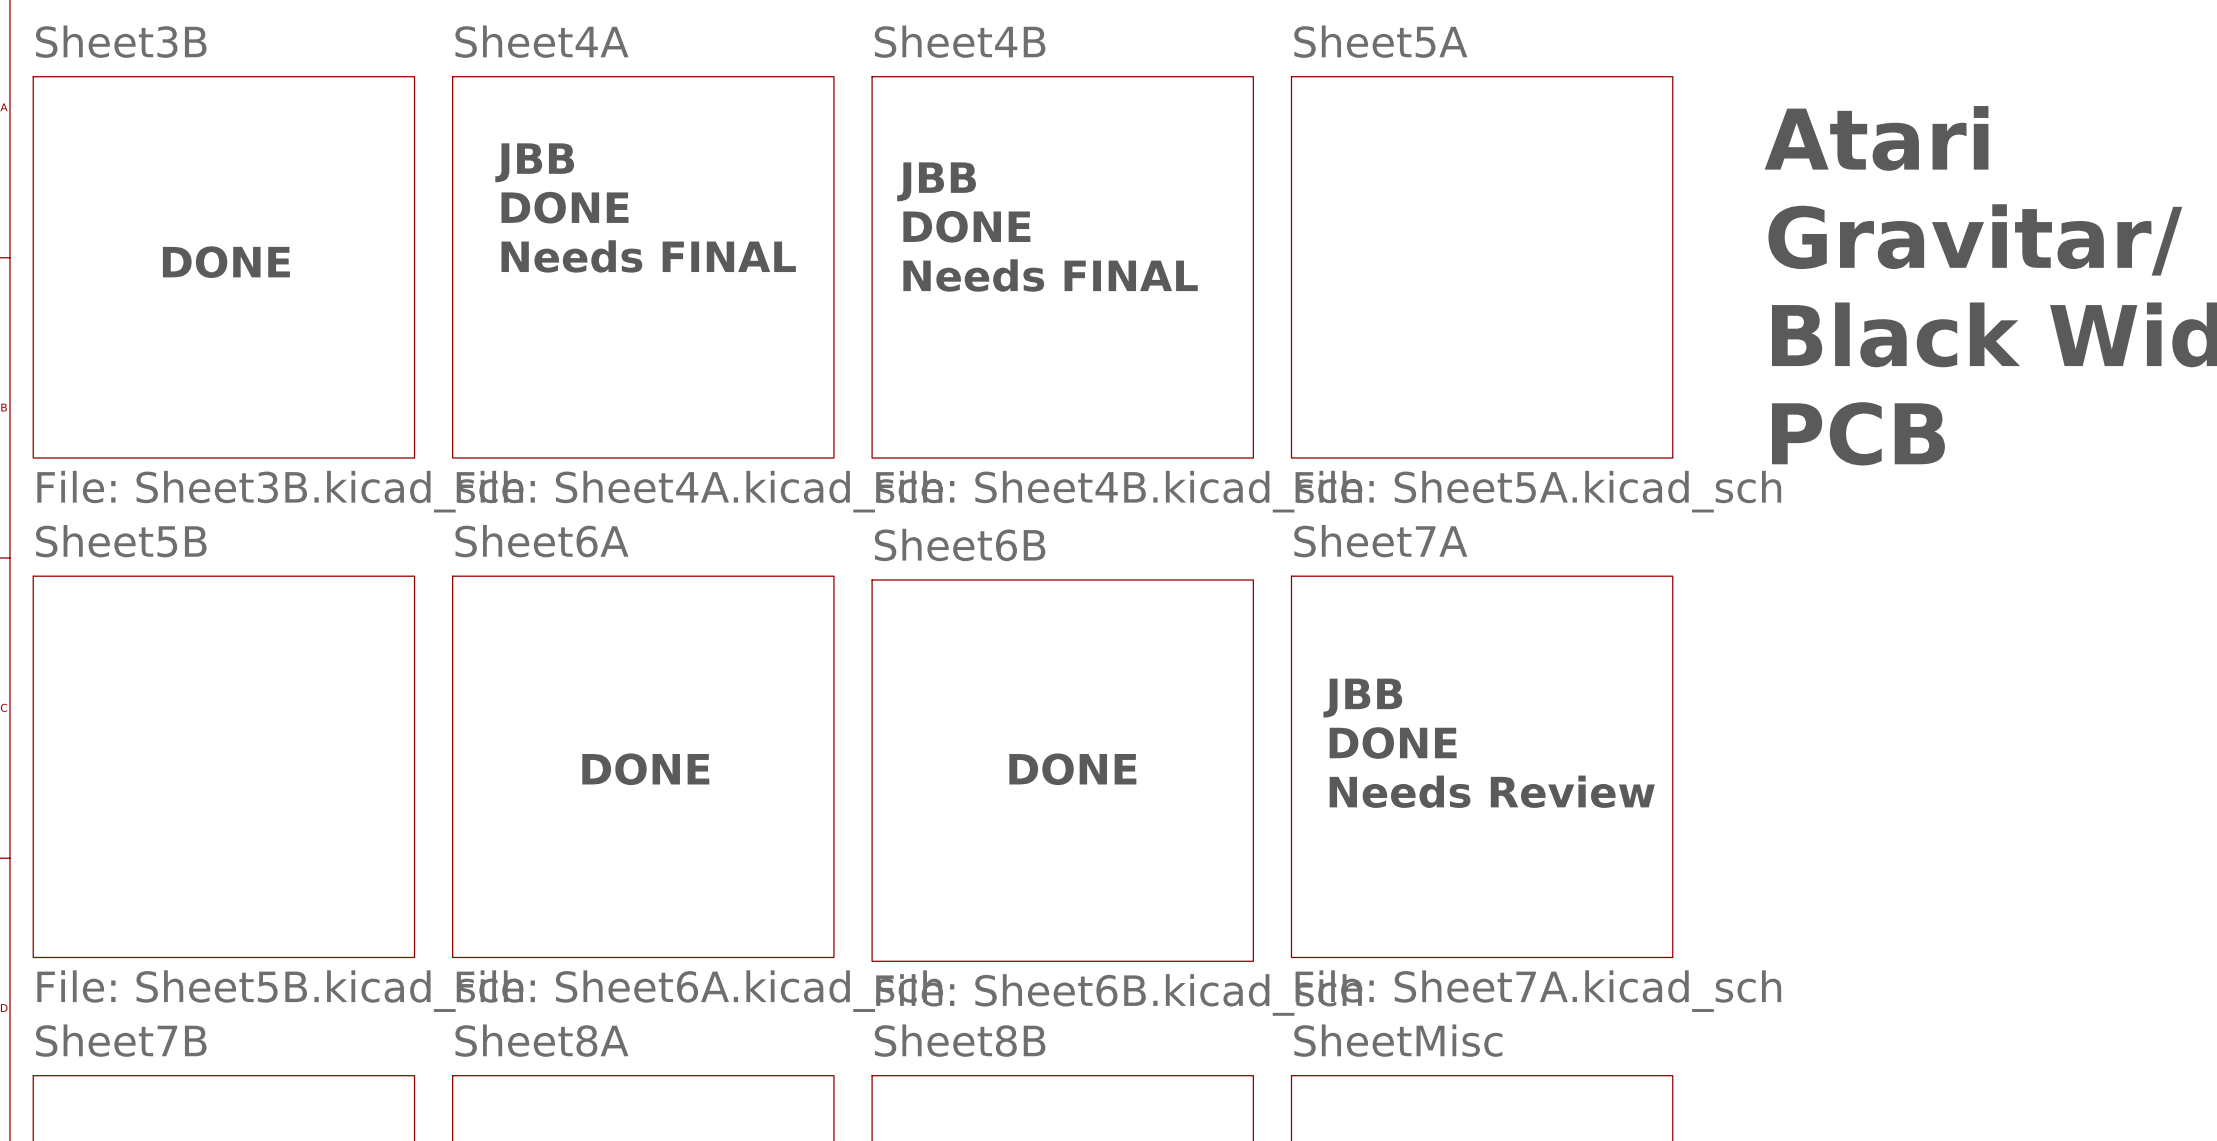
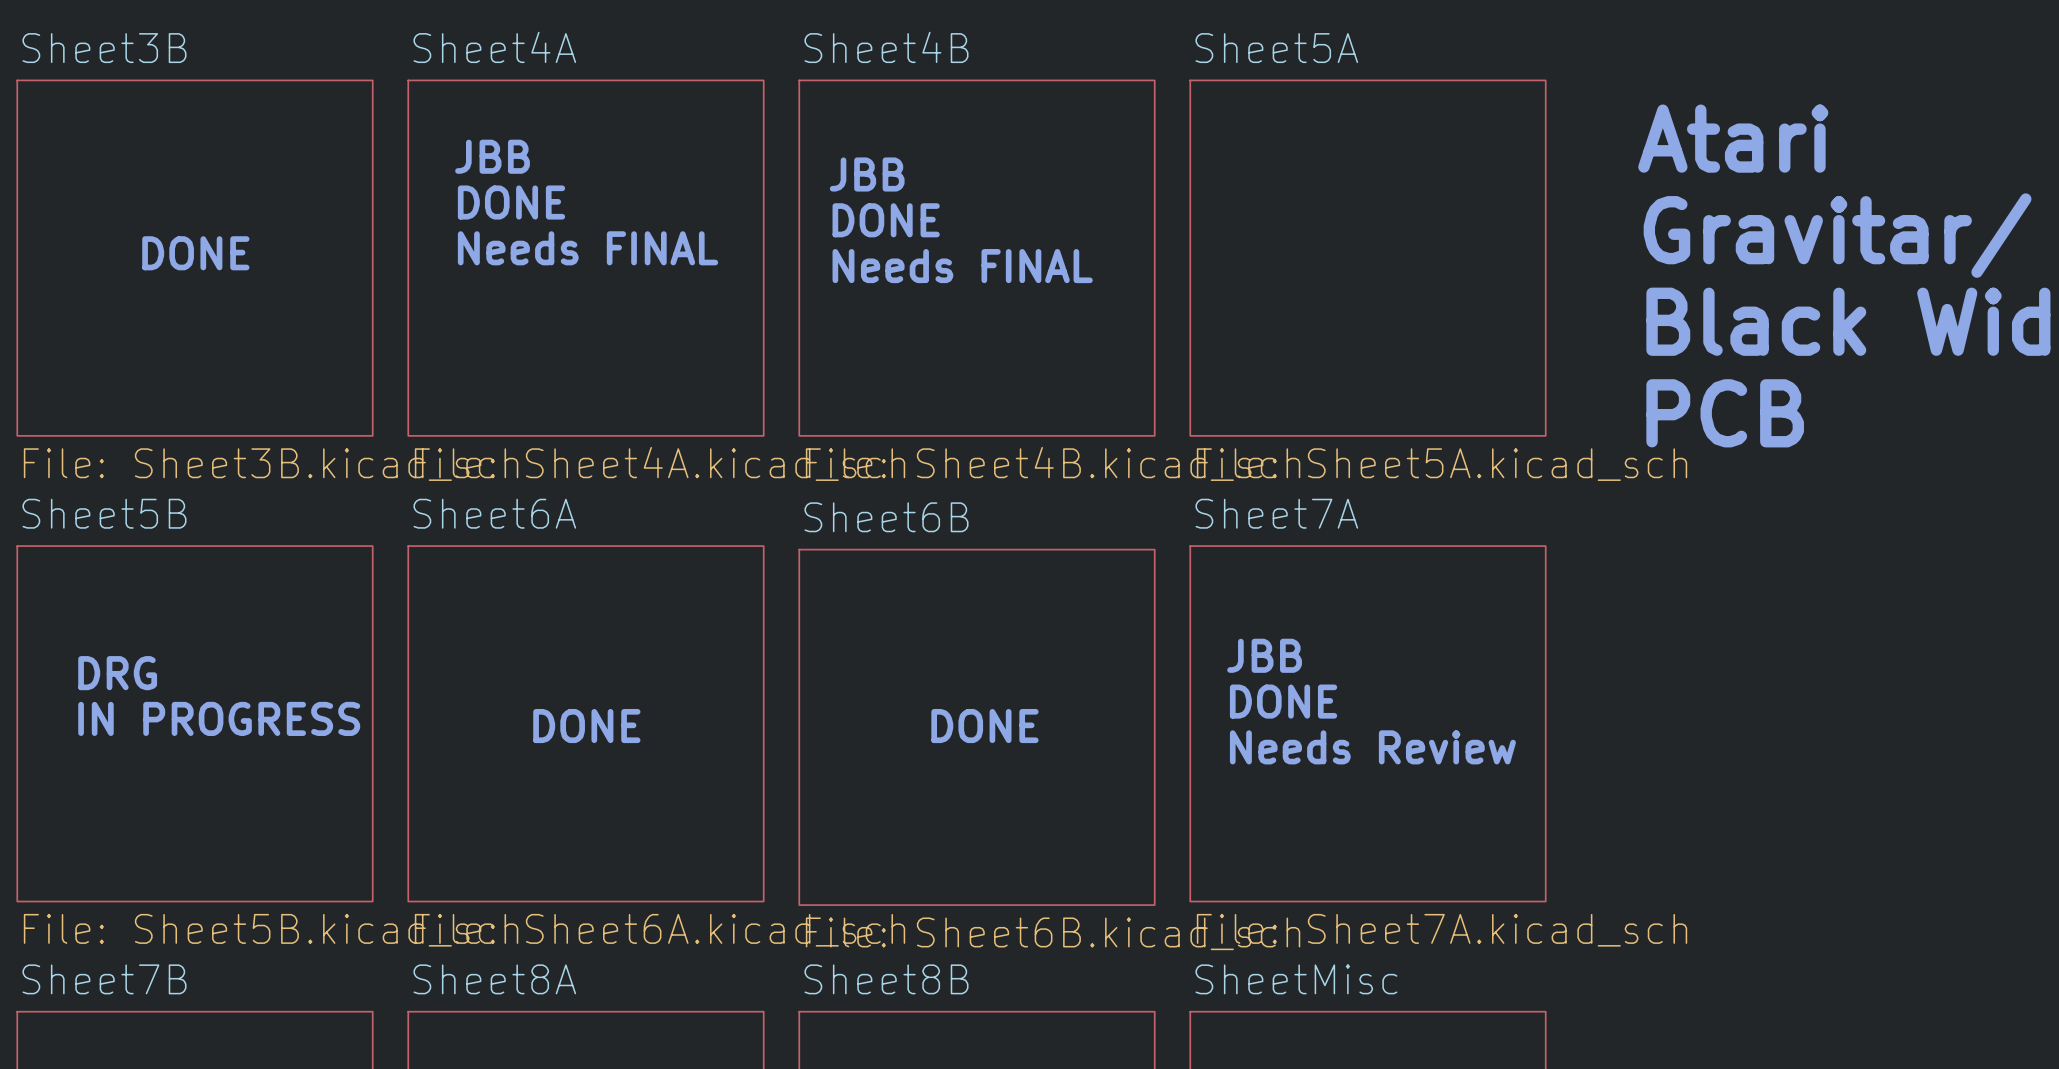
text: none -> DRG (117, 673)
text: none -> IN PROGRESS (219, 718)

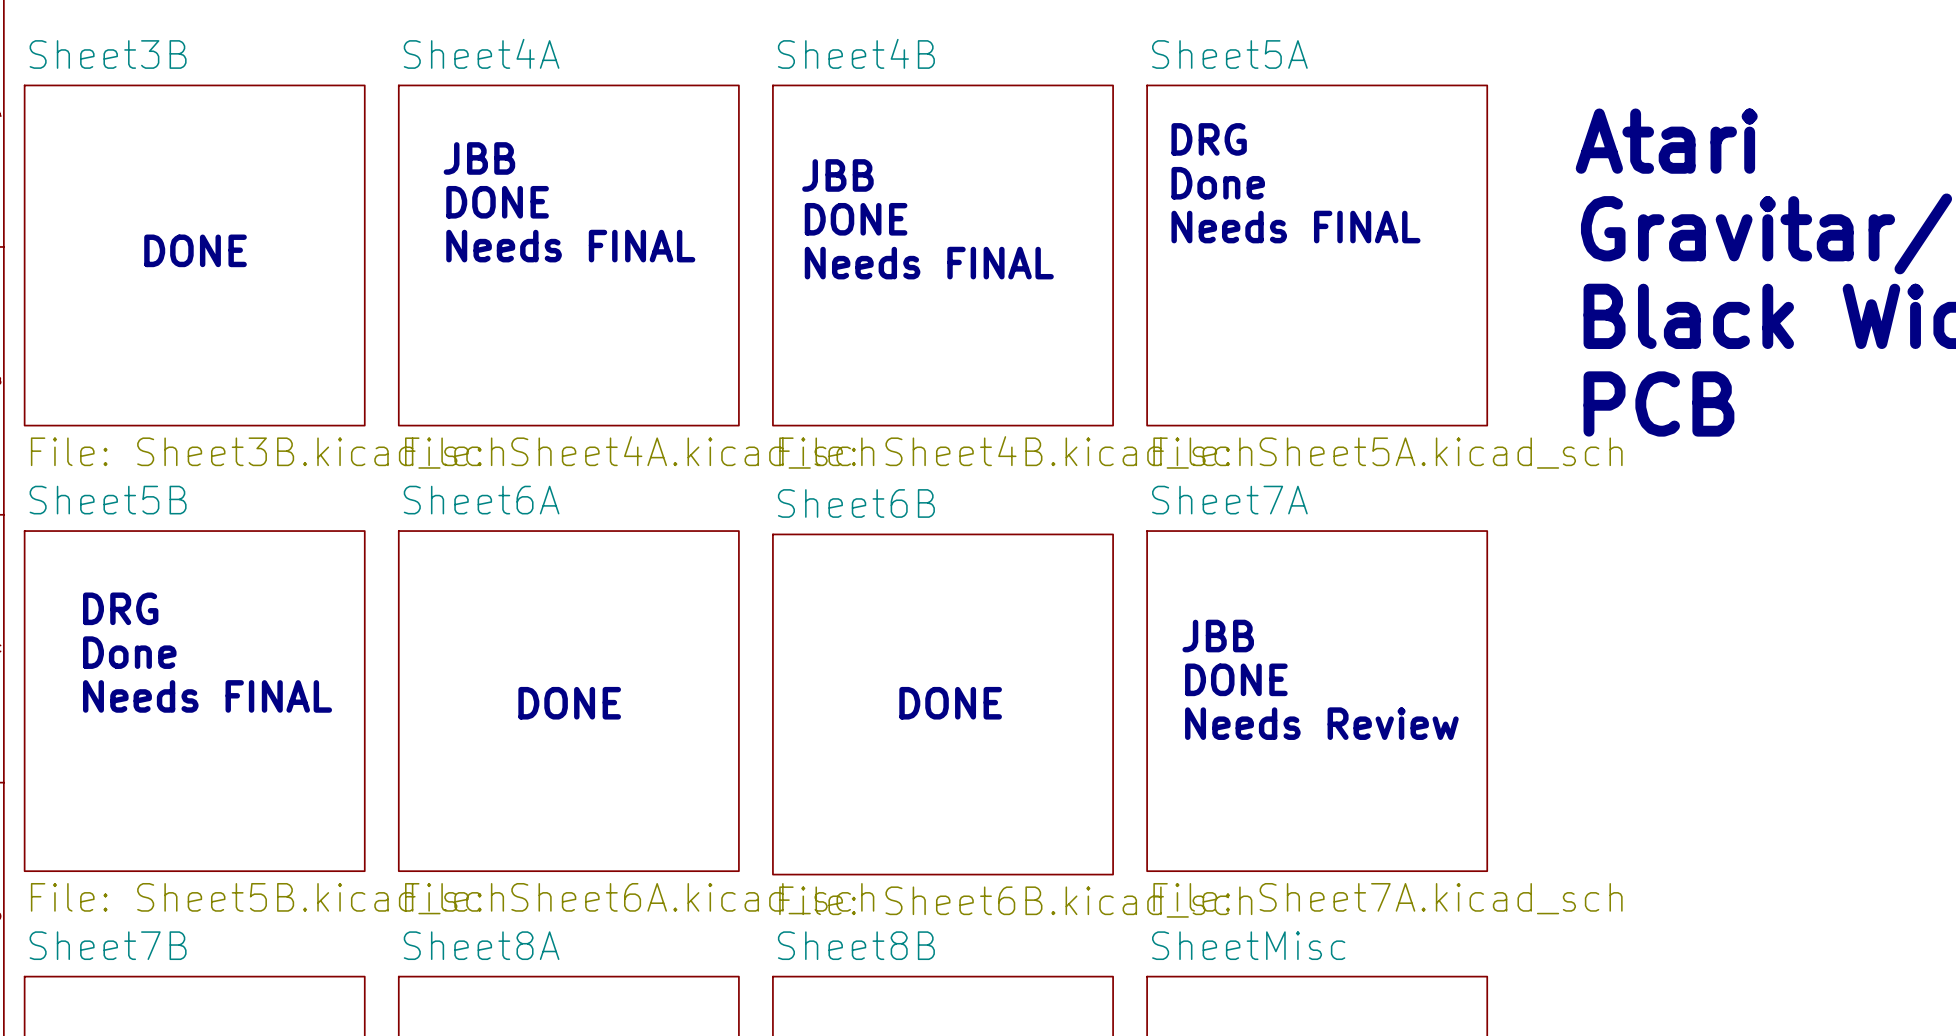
text: none -> DRG (1209, 139)
text: none -> Done (1218, 183)
text: none -> Needs FINAL (1295, 227)
text: none -> DRG (120, 608)
text: DRG (117, 673) -> Done (129, 652)
text: IN PROGRESS (219, 718) -> Needs FINAL (207, 696)

